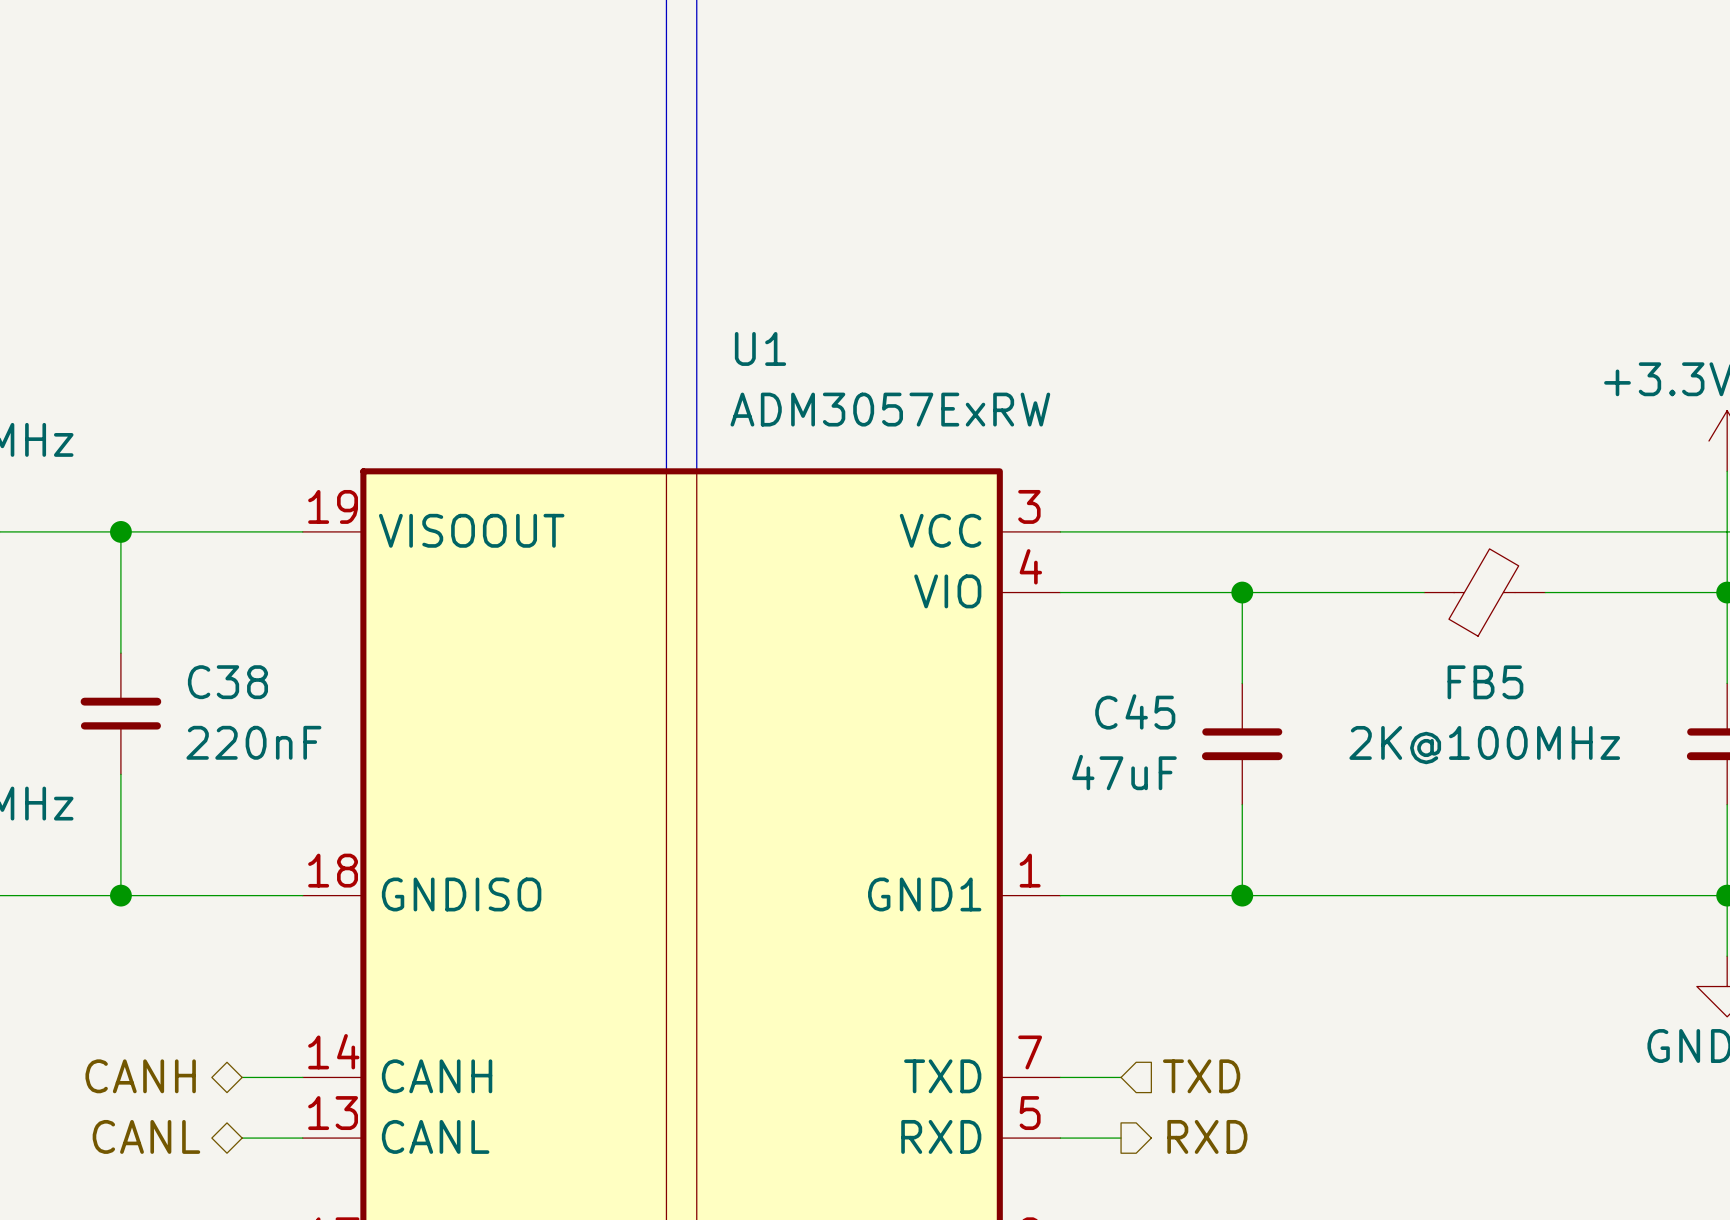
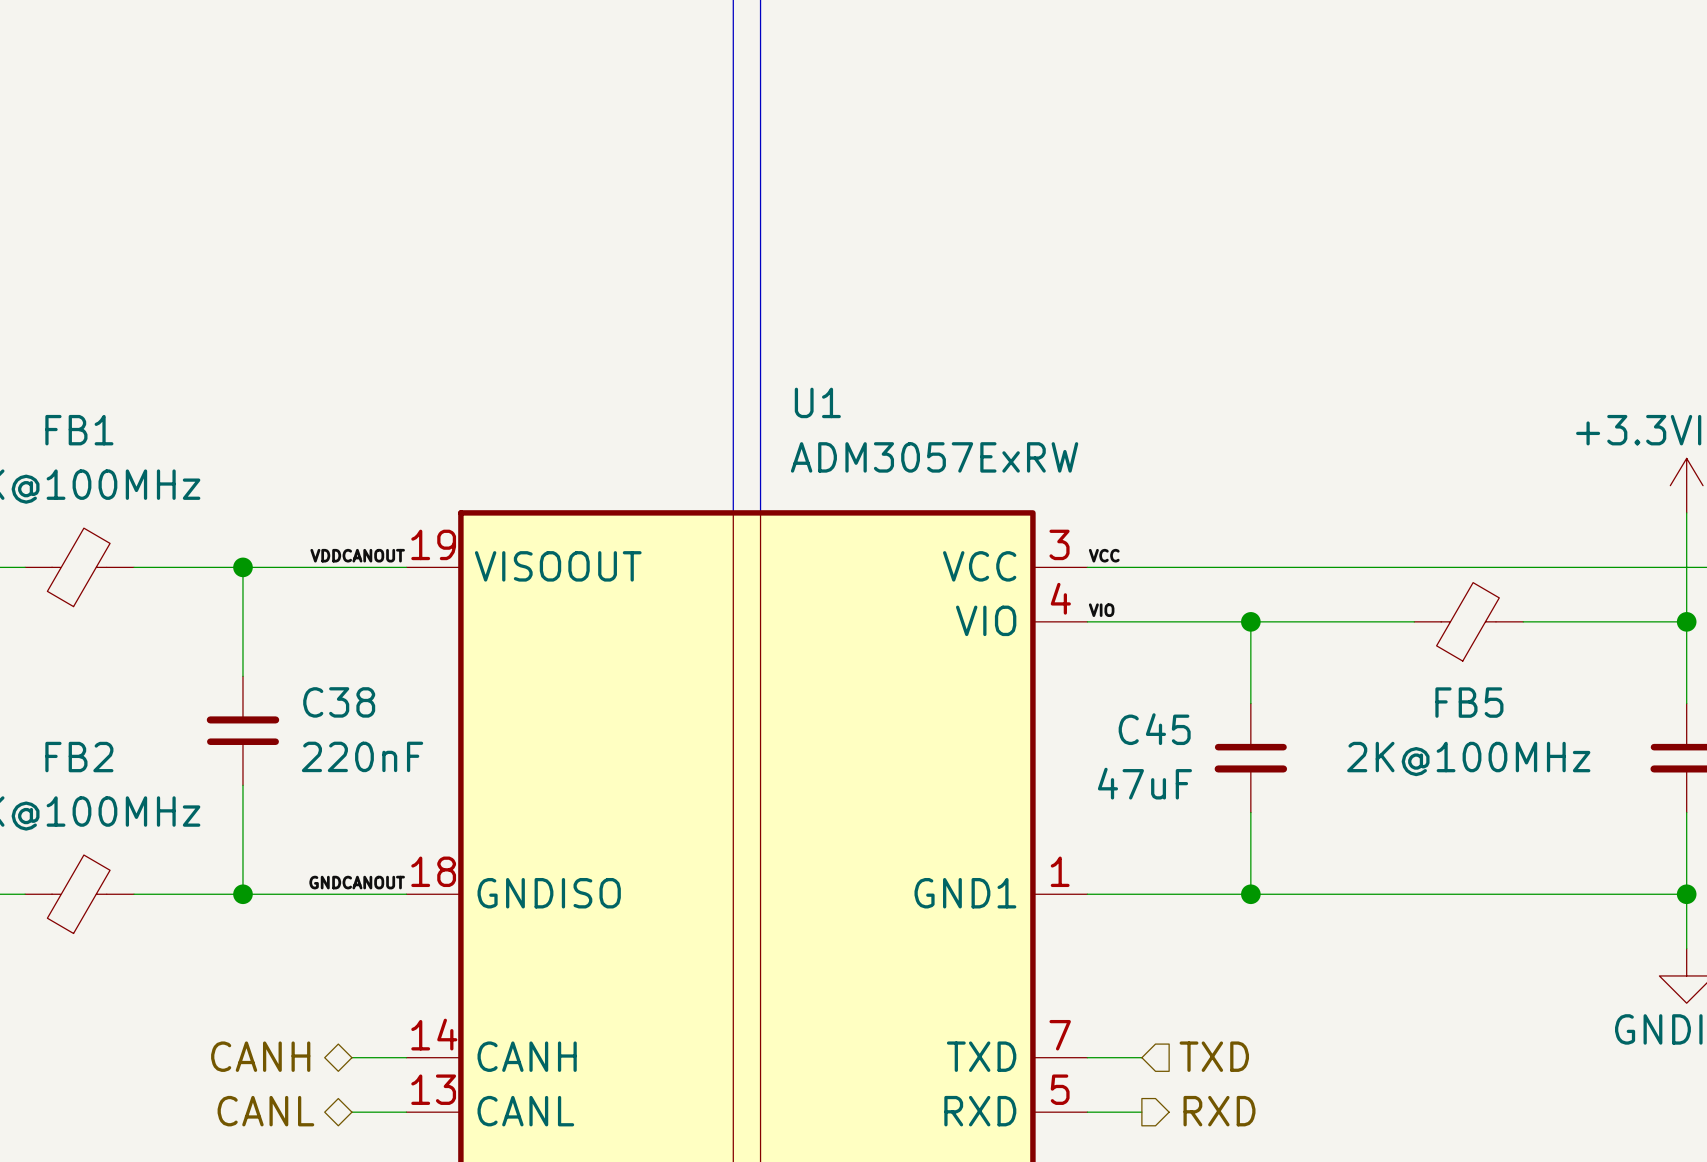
label: none -> VDDCANOUT (357, 555)
label: none -> VCC (1104, 555)
label: none -> VIO (1101, 610)
label: none -> GNDCANOUT (357, 882)

